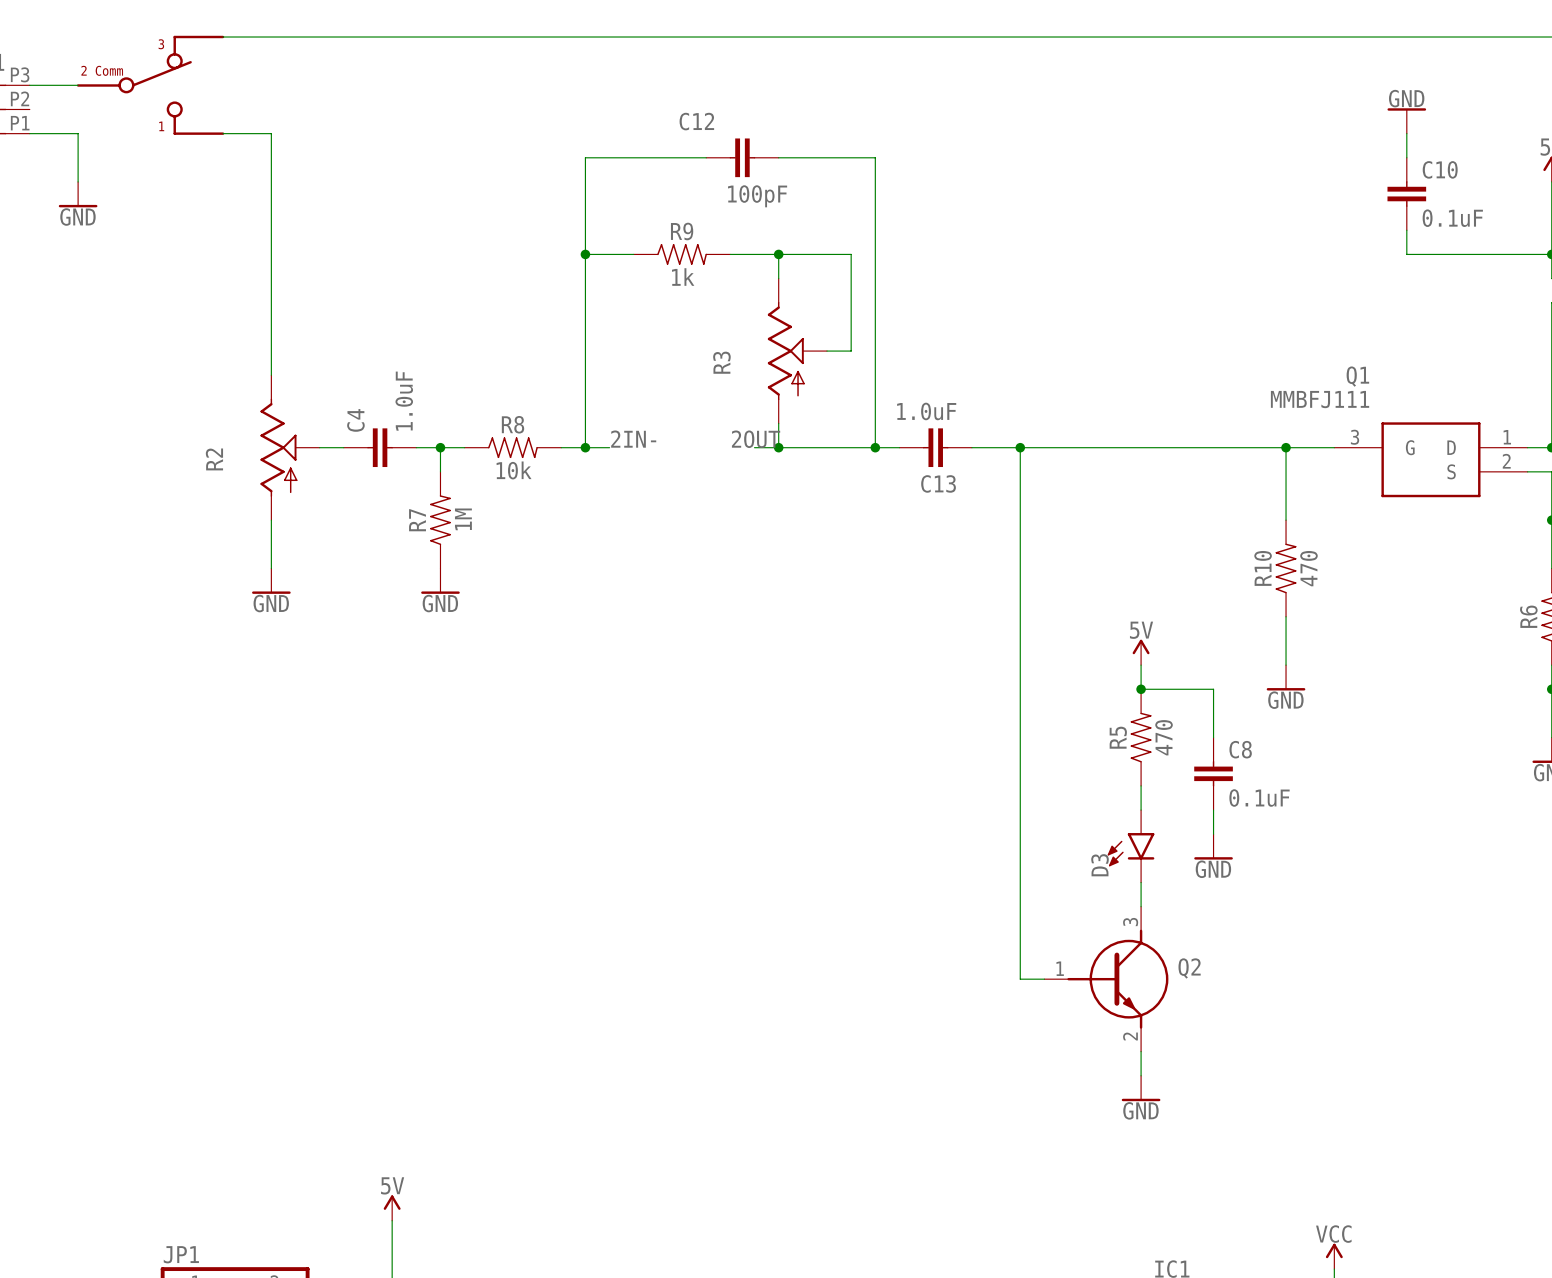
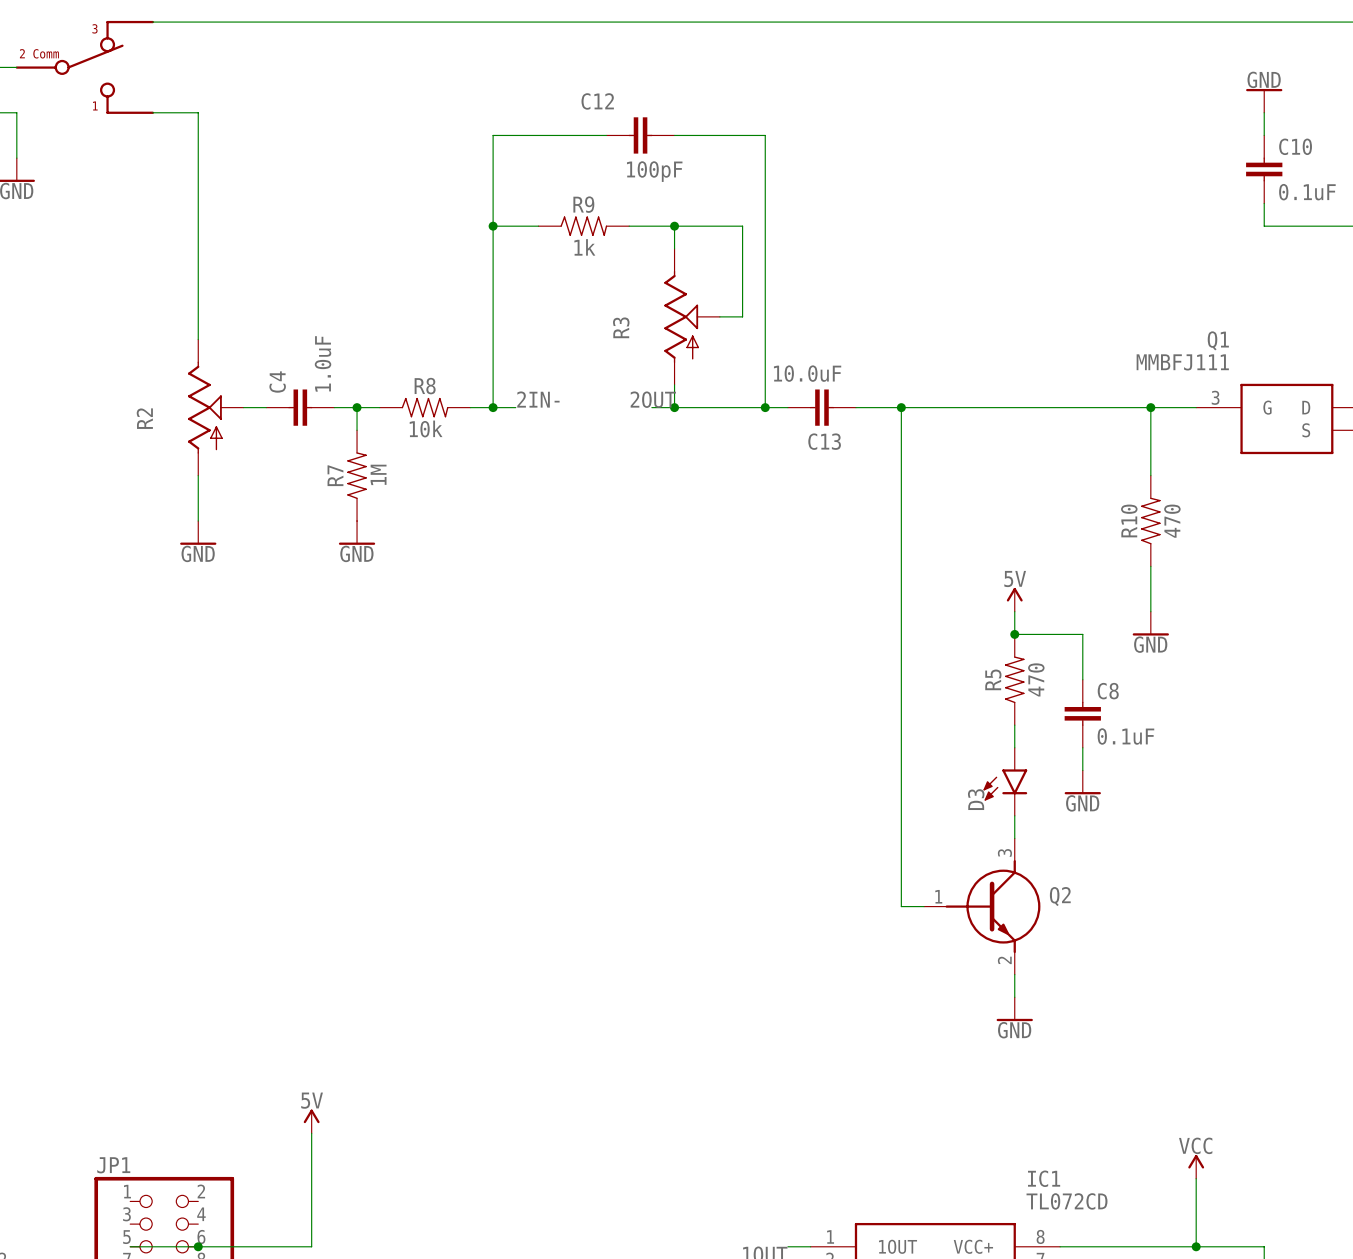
C13 value: 1.0uF (926, 411) -> 10.0uF (807, 373)

